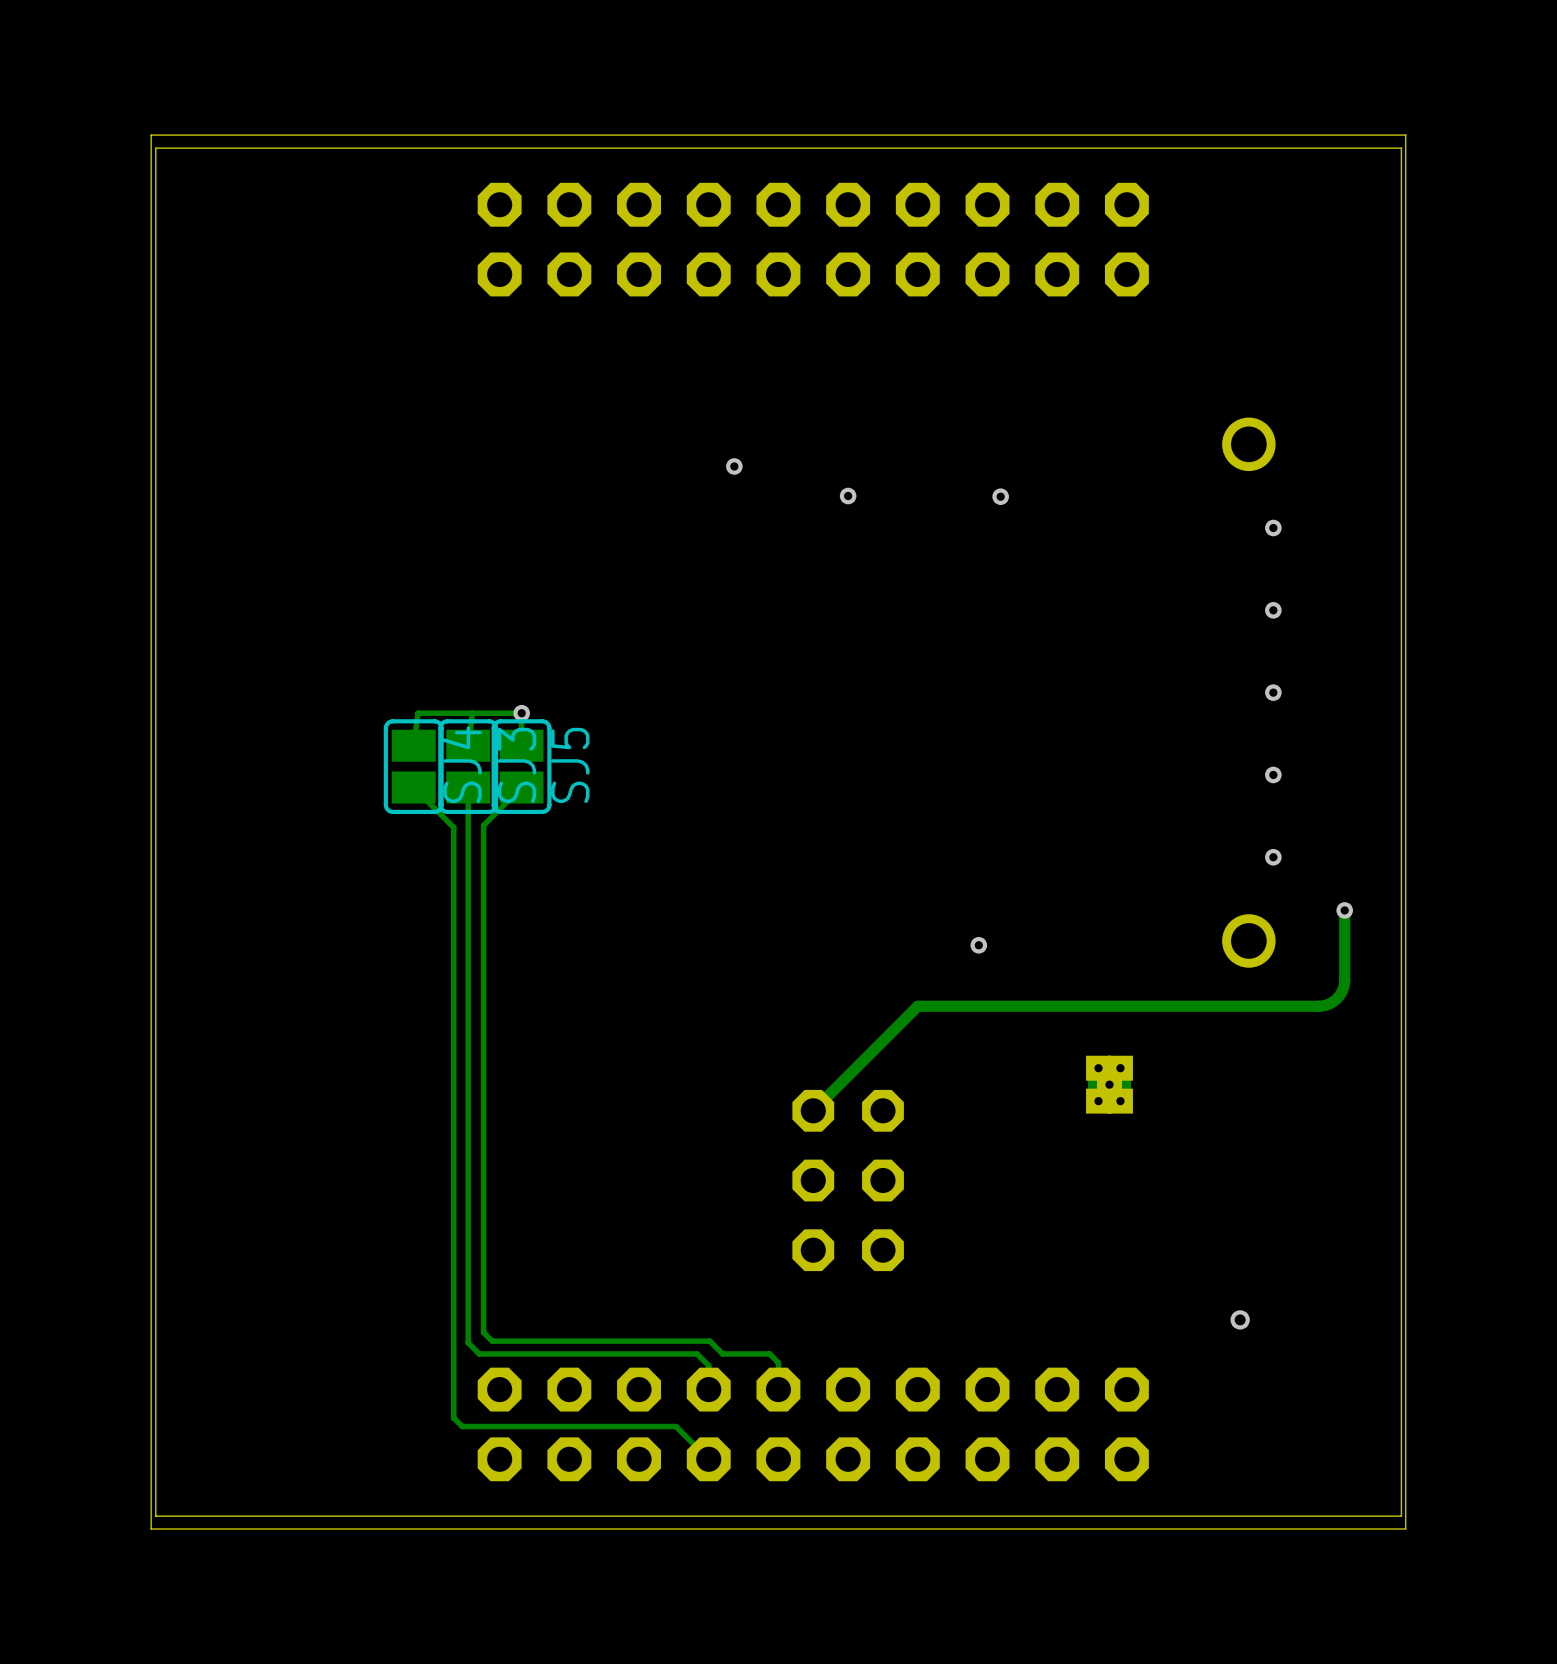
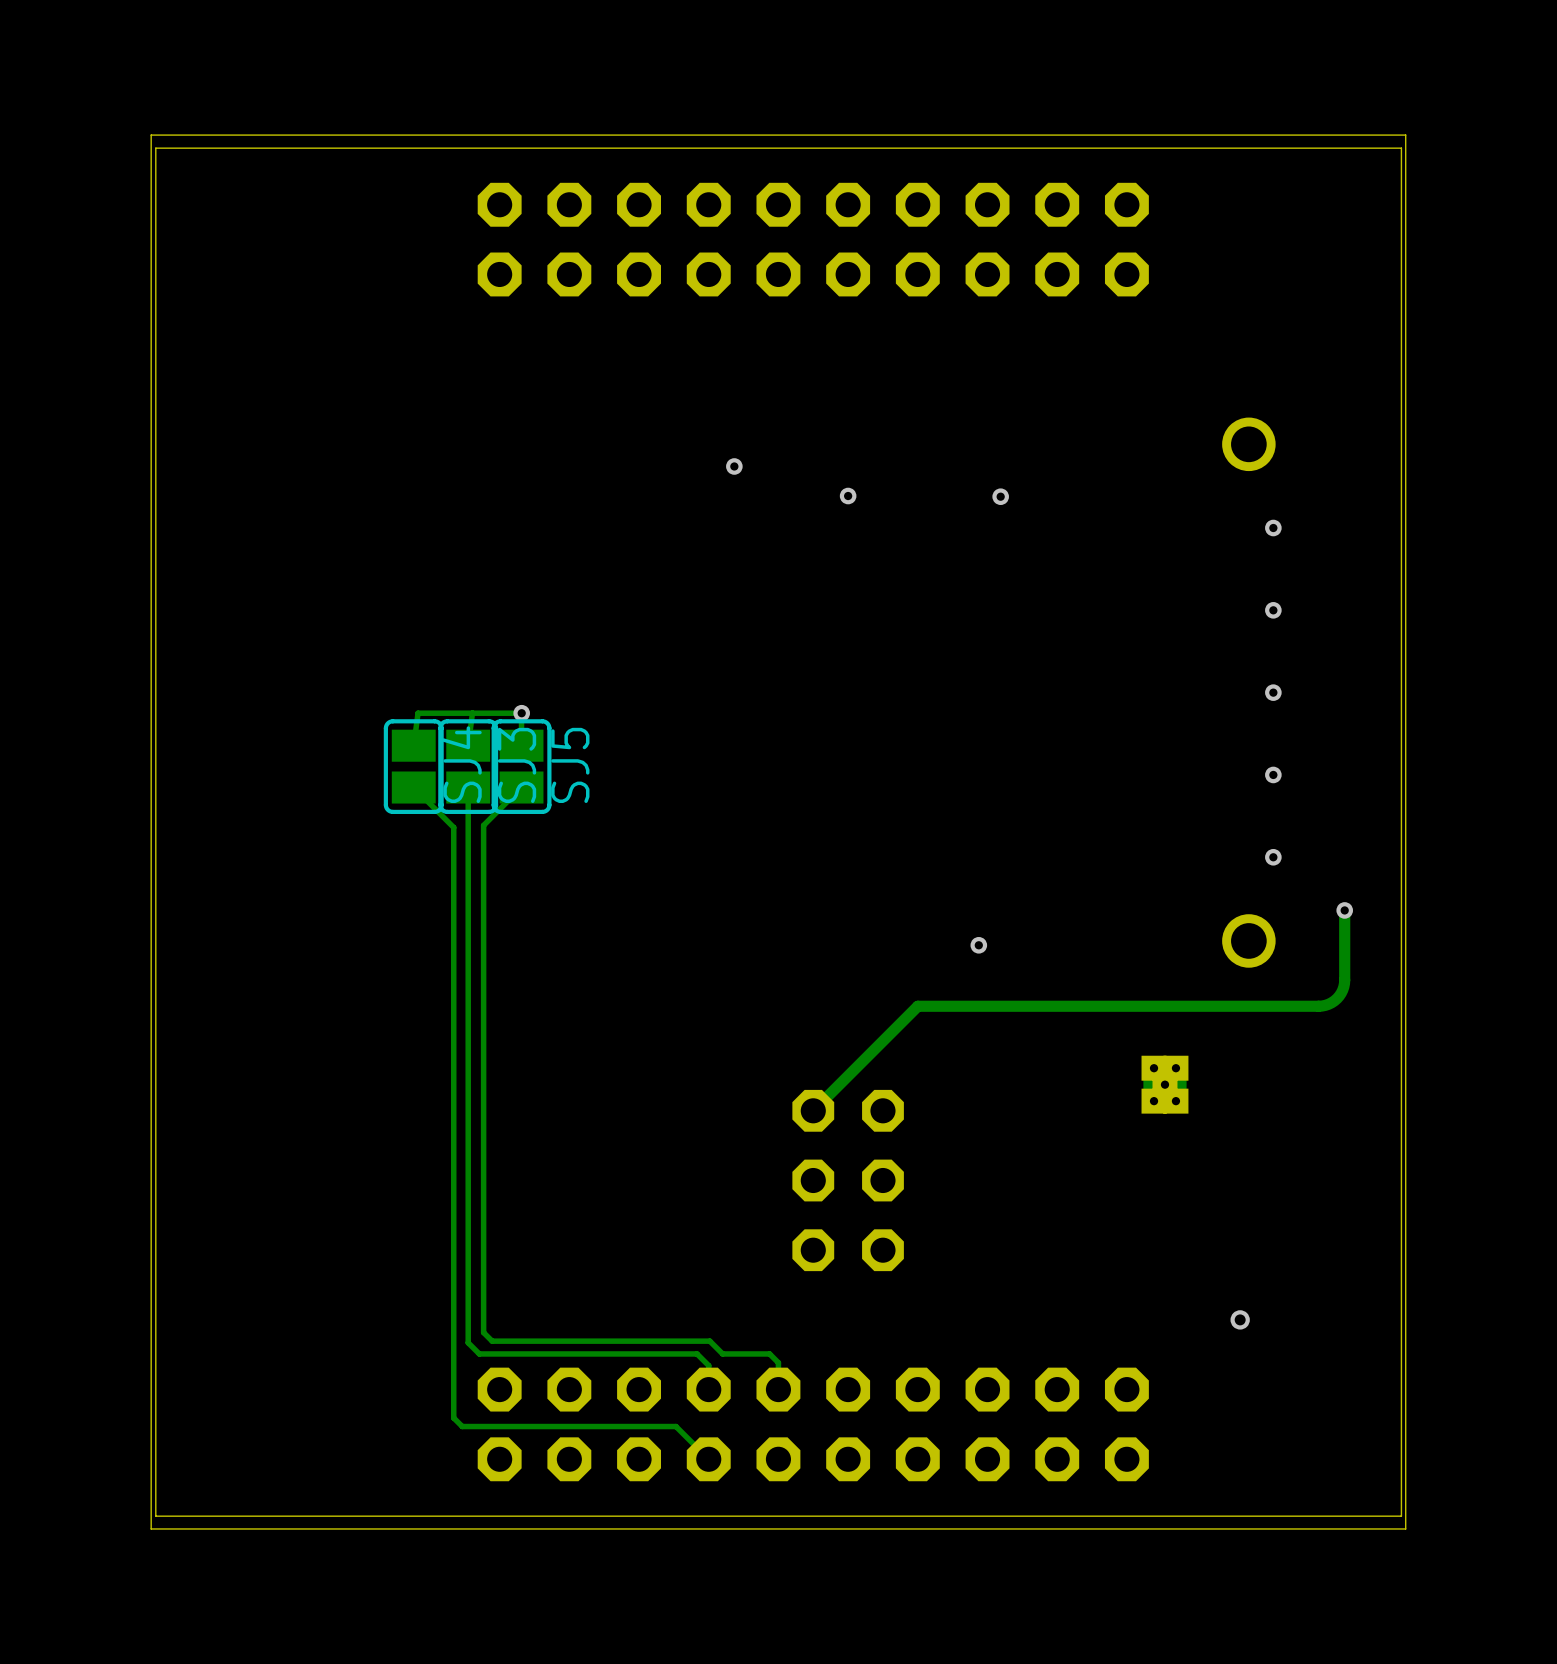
part position: (1109, 1084) -> (1164, 1084)

